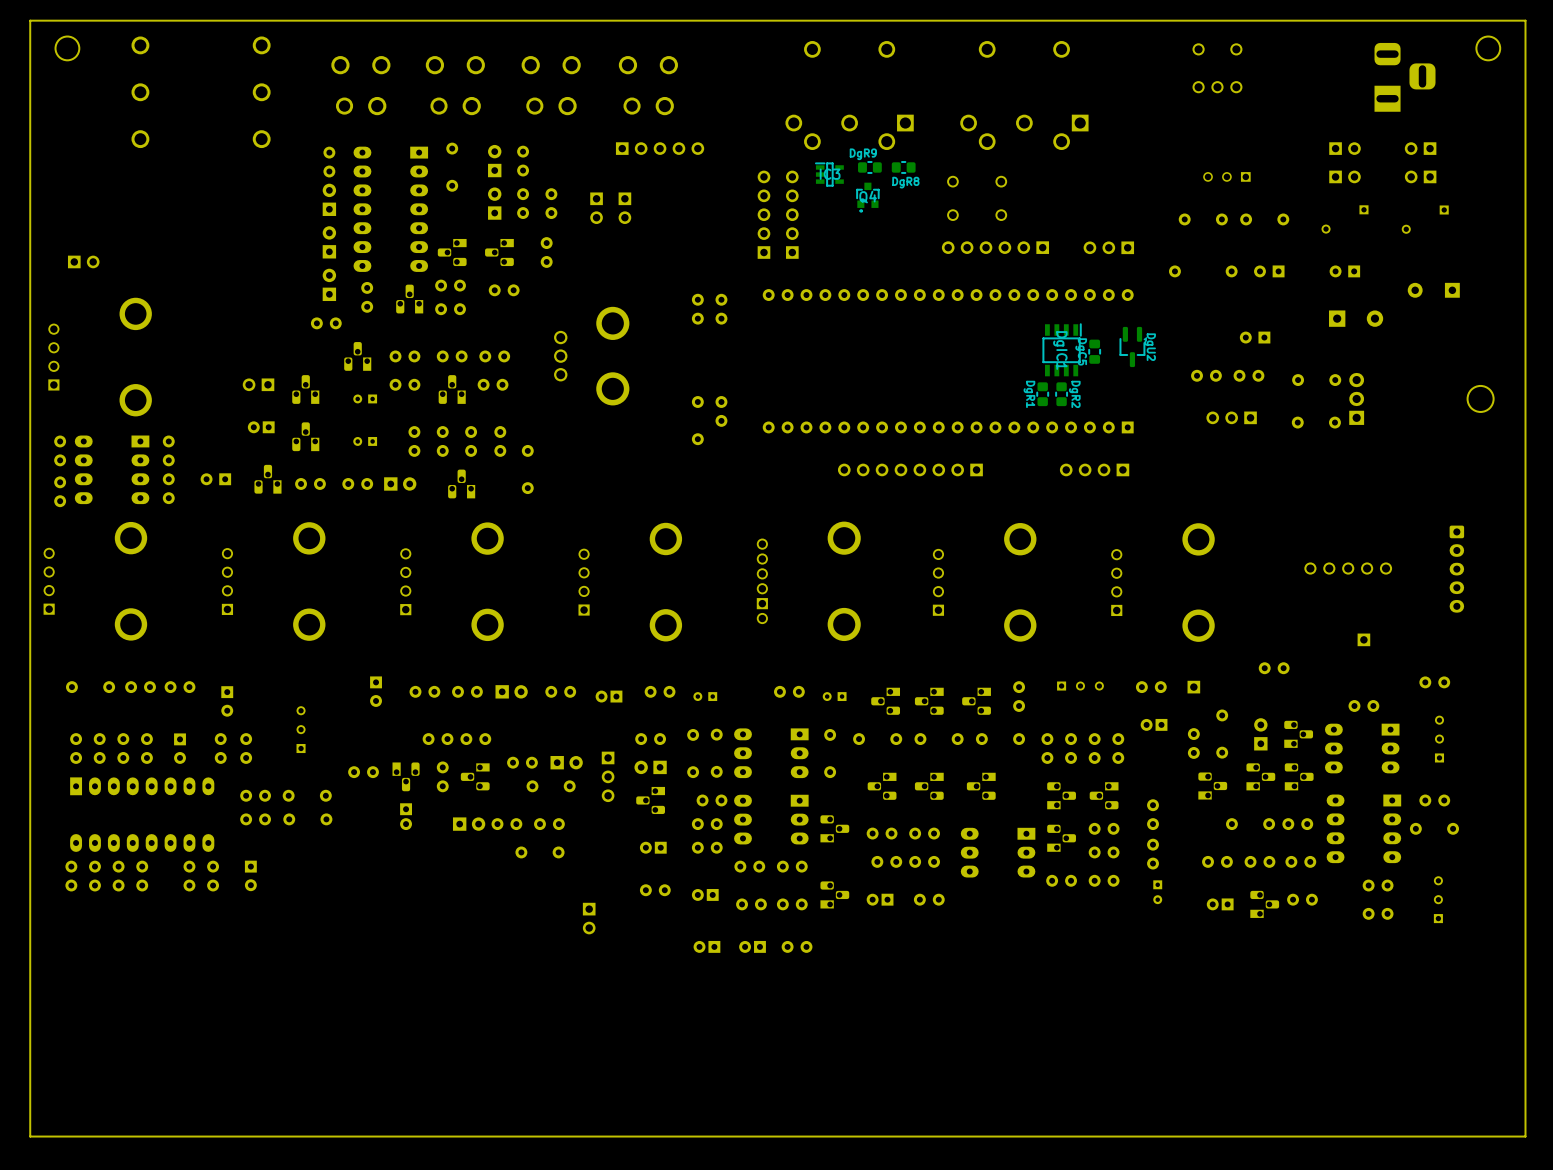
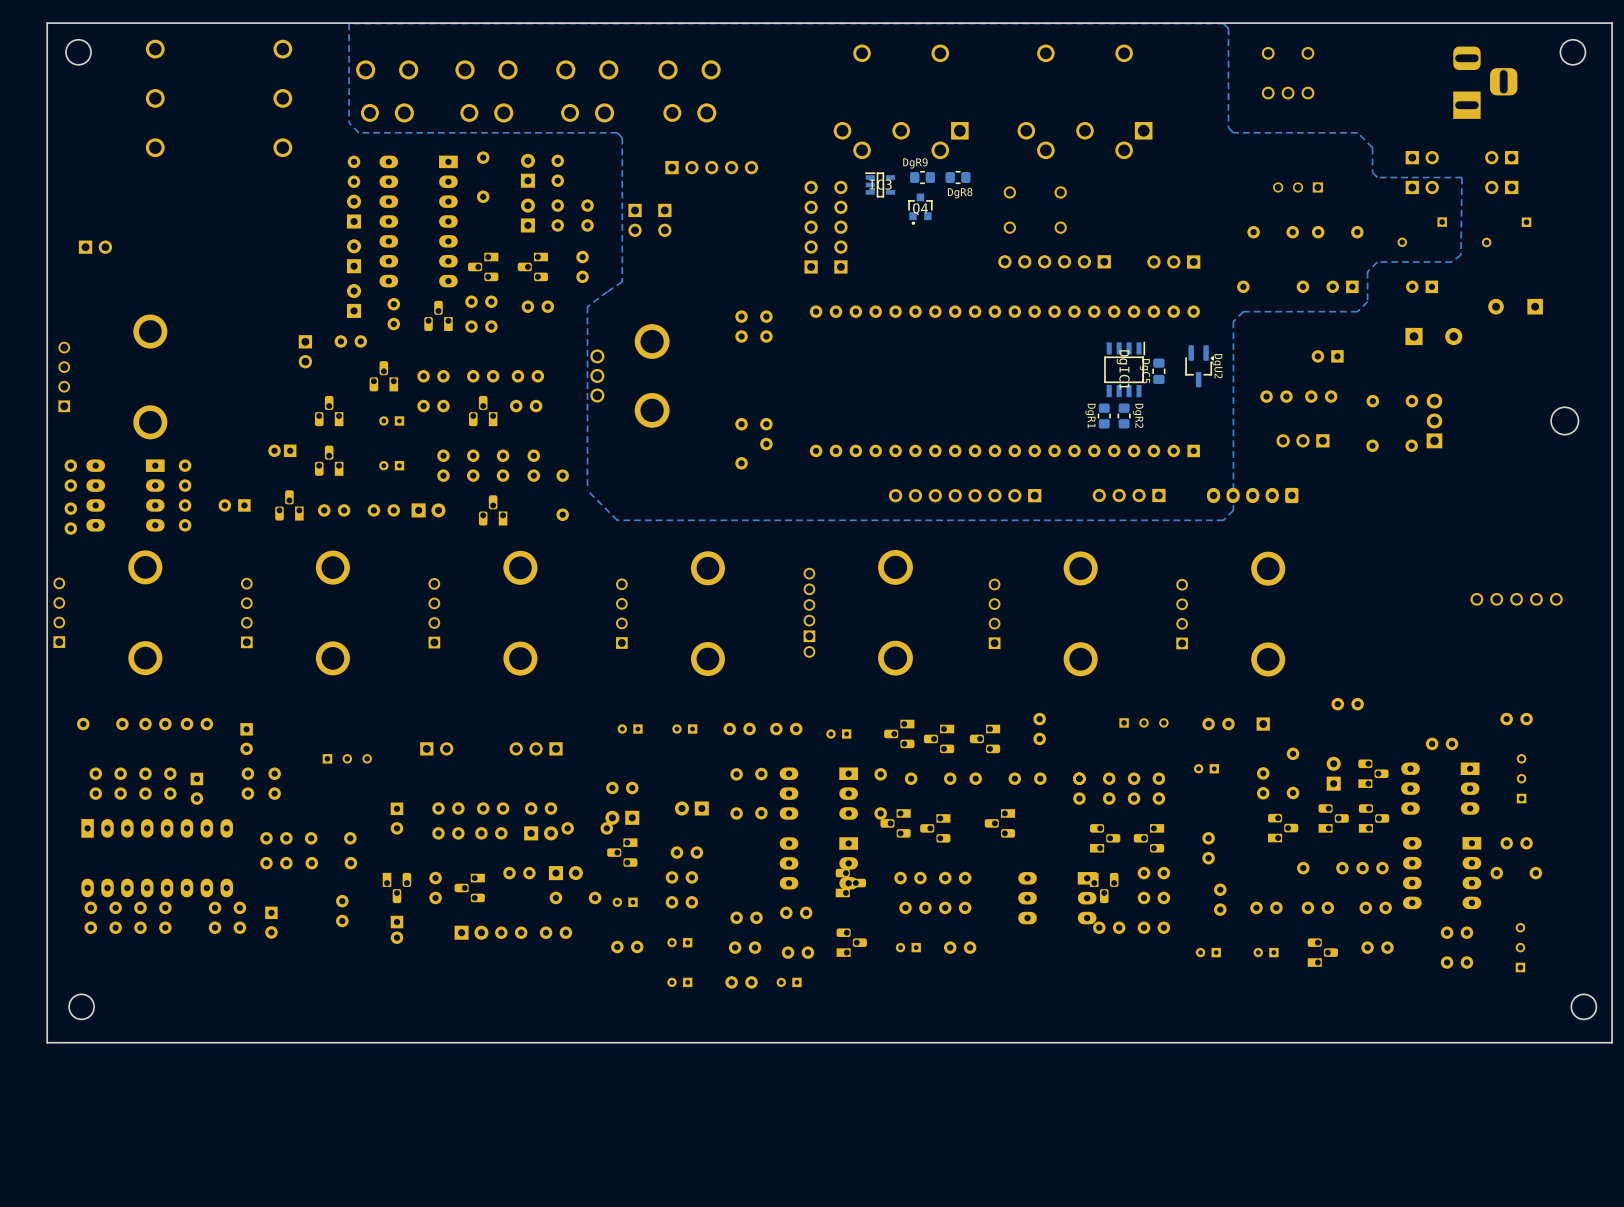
board edge: (37, 20) (30, 20) (30, 1136) (1525, 1136) (1525, 990) -> (47, 23) (47, 1042) (1612, 1042)
zone outline: none -> (1223, 23) (349, 23) (349, 122) (358, 132) (617, 132) (622, 137) (622, 281) (587, 306) (587, 490) (617, 520) (1223, 520) (1233, 510) (1233, 321) (1243, 311) (1357, 311) (1367, 301) (1367, 271) (1377, 261) (1452, 261) (1460, 254) (1461, 177) (1377, 177) (1372, 172) (1372, 147) (1357, 132) (1233, 132) (1228, 127) (1228, 28) (1223, 23)
part position: (660, 148) -> (711, 167)
part position: (83, 261) -> (95, 247)
part rotation: 0° (258, 384) -> 90° counterclockwise (305, 351)
part position: (258, 384) -> (305, 351)
part position: (1094, 469) -> (1129, 495)
part: none -> (1252, 495)
part position: (1348, 568) -> (1516, 599)
part: (1456, 569) -> none
part: (1363, 639) -> none
part footprint: [774, 685, 805, 698] -> [826, 729, 852, 739]
part position: (376, 691) -> (396, 818)
part: (424, 691) -> none
part: (467, 691) -> none
part: (511, 691) -> none
part: (560, 691) -> none
part: none -> (630, 729)
part: none -> (684, 729)
part: (660, 691) -> none
part: none -> (739, 729)
part: none -> (786, 729)
part: none -> (1039, 729)
part: (609, 696) -> none
part: (705, 696) -> none
part: (834, 696) -> none
part: none -> (899, 733)
part: (1019, 696) -> none
part: (976, 701) -> none
part: none -> (436, 748)
part: (1154, 724) -> none
part rotation: 0° (301, 729) -> 90° clockwise (347, 758)
part: none -> (1206, 768)
part: (438, 739) -> none
part: (475, 739) -> none
part: (650, 739) -> none
part: none -> (95, 783)
part: none -> (120, 783)
part: none -> (145, 783)
part: none -> (170, 783)
part: none -> (247, 783)
part: none -> (274, 783)
part: none -> (622, 788)
part: (76, 748) -> none
part: (99, 748) -> none
part: (123, 748) -> none
part: (146, 748) -> none
part: (220, 748) -> none
part: (246, 748) -> none
part: none -> (1079, 788)
part: (1118, 748) -> none
part position: (522, 762) -> (541, 808)
part rotation: 0° (566, 762) -> 180° (622, 817)
part position: (566, 762) -> (622, 817)
part: none -> (448, 808)
part: none -> (493, 808)
part: (363, 772) -> none
part: (406, 776) -> none
part: (442, 776) -> none
part: (475, 776) -> none
part rotation: 0° (608, 776) -> 90° clockwise (536, 748)
part position: (608, 776) -> (536, 748)
part: none -> (895, 823)
part position: (929, 786) -> (999, 823)
part: (981, 786) -> none
part: none -> (448, 833)
part: none -> (491, 833)
part: none -> (541, 833)
part: none -> (1105, 838)
part: (1061, 795) -> none
part: none -> (1148, 838)
part: (1104, 795) -> none
part: (650, 800) -> none
part: (712, 800) -> none
part: none -> (622, 852)
part: none -> (686, 852)
part position: (1153, 814) -> (1208, 848)
part position: (406, 816) -> (396, 929)
part: (469, 824) -> none
part position: (506, 824) -> (519, 873)
part: (549, 824) -> none
part: (707, 824) -> none
part: none -> (565, 873)
part: (834, 828) -> none
part: none -> (1153, 873)
part: (1104, 828) -> none
part: none -> (681, 877)
part: none -> (910, 878)
part: (882, 833) -> none
part: none -> (955, 878)
part: (924, 833) -> none
part: none -> (850, 883)
part rotation: 0° (1061, 838) -> 90° clockwise (1104, 888)
part position: (1061, 838) -> (1104, 888)
part: none -> (396, 888)
part: none -> (435, 888)
part: none -> (469, 888)
part: (653, 847) -> none
part: (707, 847) -> none
part: none -> (1153, 897)
part: (1104, 852) -> none
part: none -> (625, 902)
part: none -> (681, 902)
part: none -> (915, 907)
part: (886, 861) -> none
part: none -> (955, 907)
part: (924, 861) -> none
part: none -> (1266, 907)
part: (1217, 861) -> none
part: none -> (1317, 907)
part: (1259, 861) -> none
part: none -> (342, 911)
part: (792, 866) -> none
part: none -> (90, 917)
part: none -> (115, 917)
part: none -> (140, 917)
part: none -> (165, 917)
part: none -> (215, 917)
part: none -> (239, 917)
part: none -> (746, 917)
part: (71, 876) -> none
part: (94, 876) -> none
part: (118, 876) -> none
part: (142, 876) -> none
part: (189, 876) -> none
part: (213, 876) -> none
part: none -> (1109, 927)
part: (1061, 880) -> none
part: none -> (1153, 927)
part: (1104, 880) -> none
part: none -> (471, 932)
part: none -> (511, 932)
part: none -> (555, 932)
part footprint: [691, 889, 719, 901] -> [728, 941, 762, 954]
part: (655, 890) -> none
part rotation: 0° (1157, 892) -> 90° clockwise (1208, 952)
part position: (1157, 892) -> (1208, 952)
part: none -> (679, 942)
part position: (834, 894) -> (851, 942)
part: none -> (627, 946)
part: none -> (908, 947)
part: (880, 899) -> none
part: none -> (960, 947)
part: (929, 899) -> none
part: (792, 904) -> none
part: none -> (1266, 952)
part: (1220, 904) -> none
part position: (1264, 904) -> (1322, 952)
part: (589, 918) -> none
part: none -> (679, 982)
part: none -> (741, 982)
part: none -> (789, 982)
round board edge: none -> [68, 994, 95, 1020]
round board edge: none -> [1571, 994, 1597, 1020]
part: (706, 946) -> none
part: (752, 946) -> none
part: (797, 946) -> none

